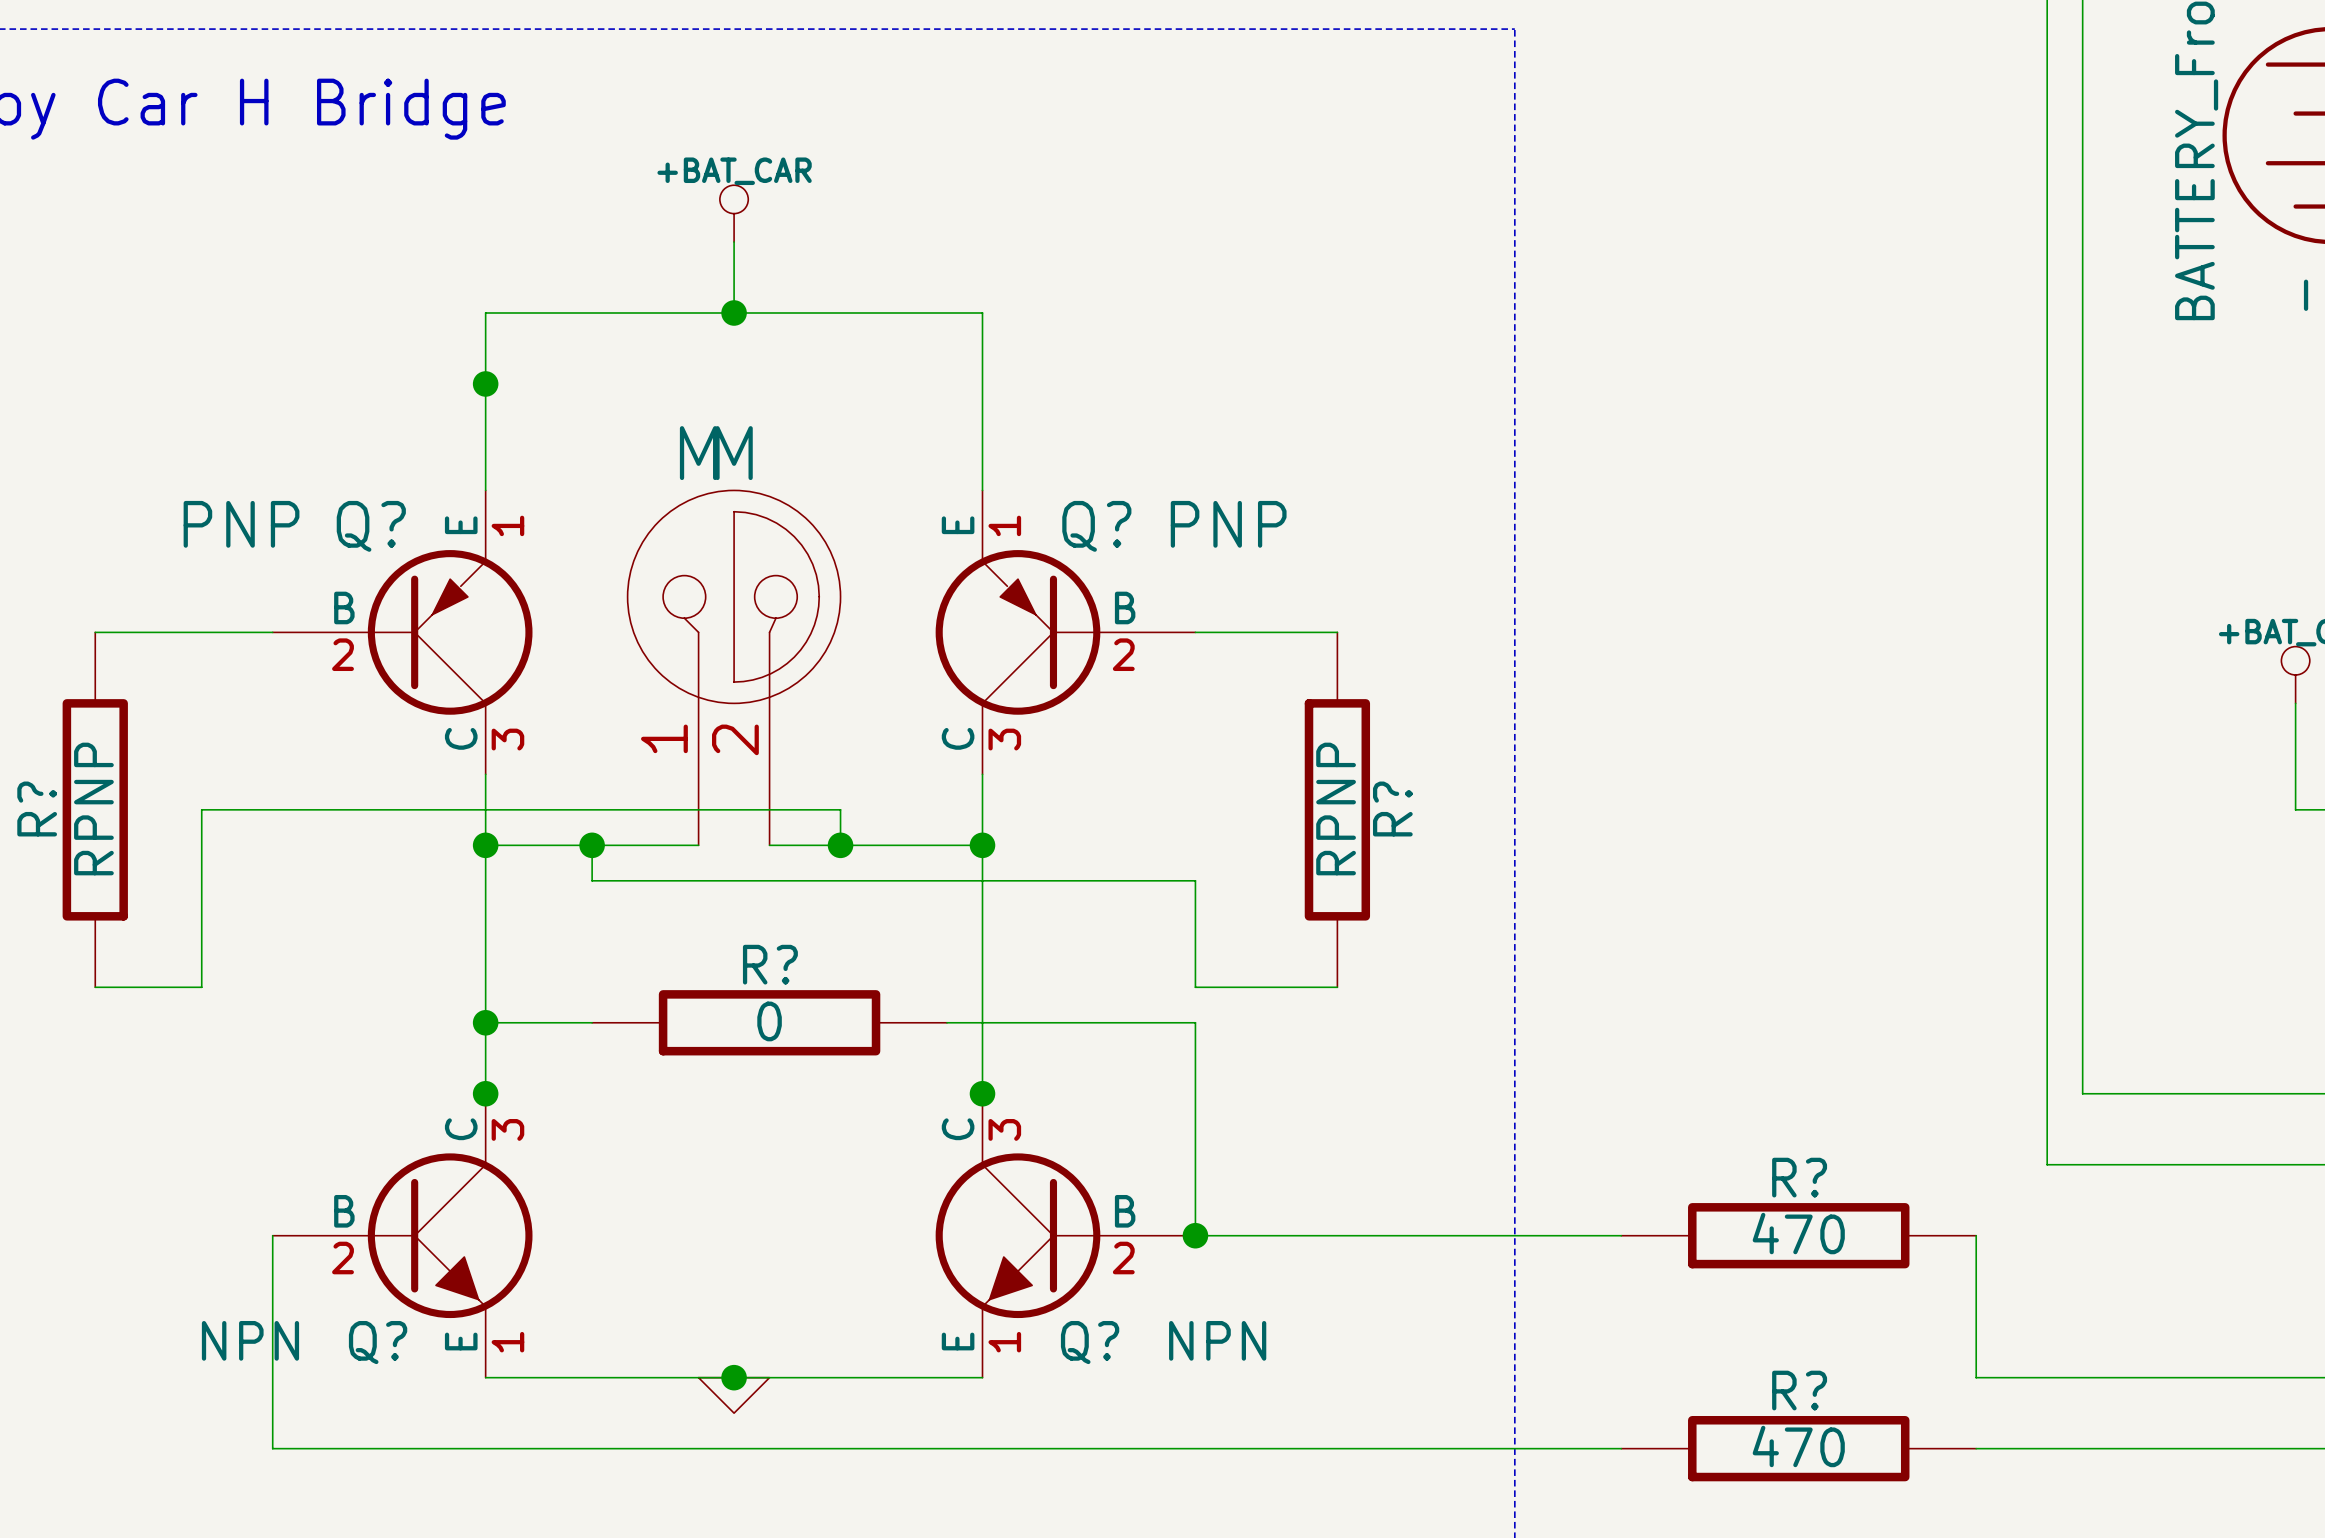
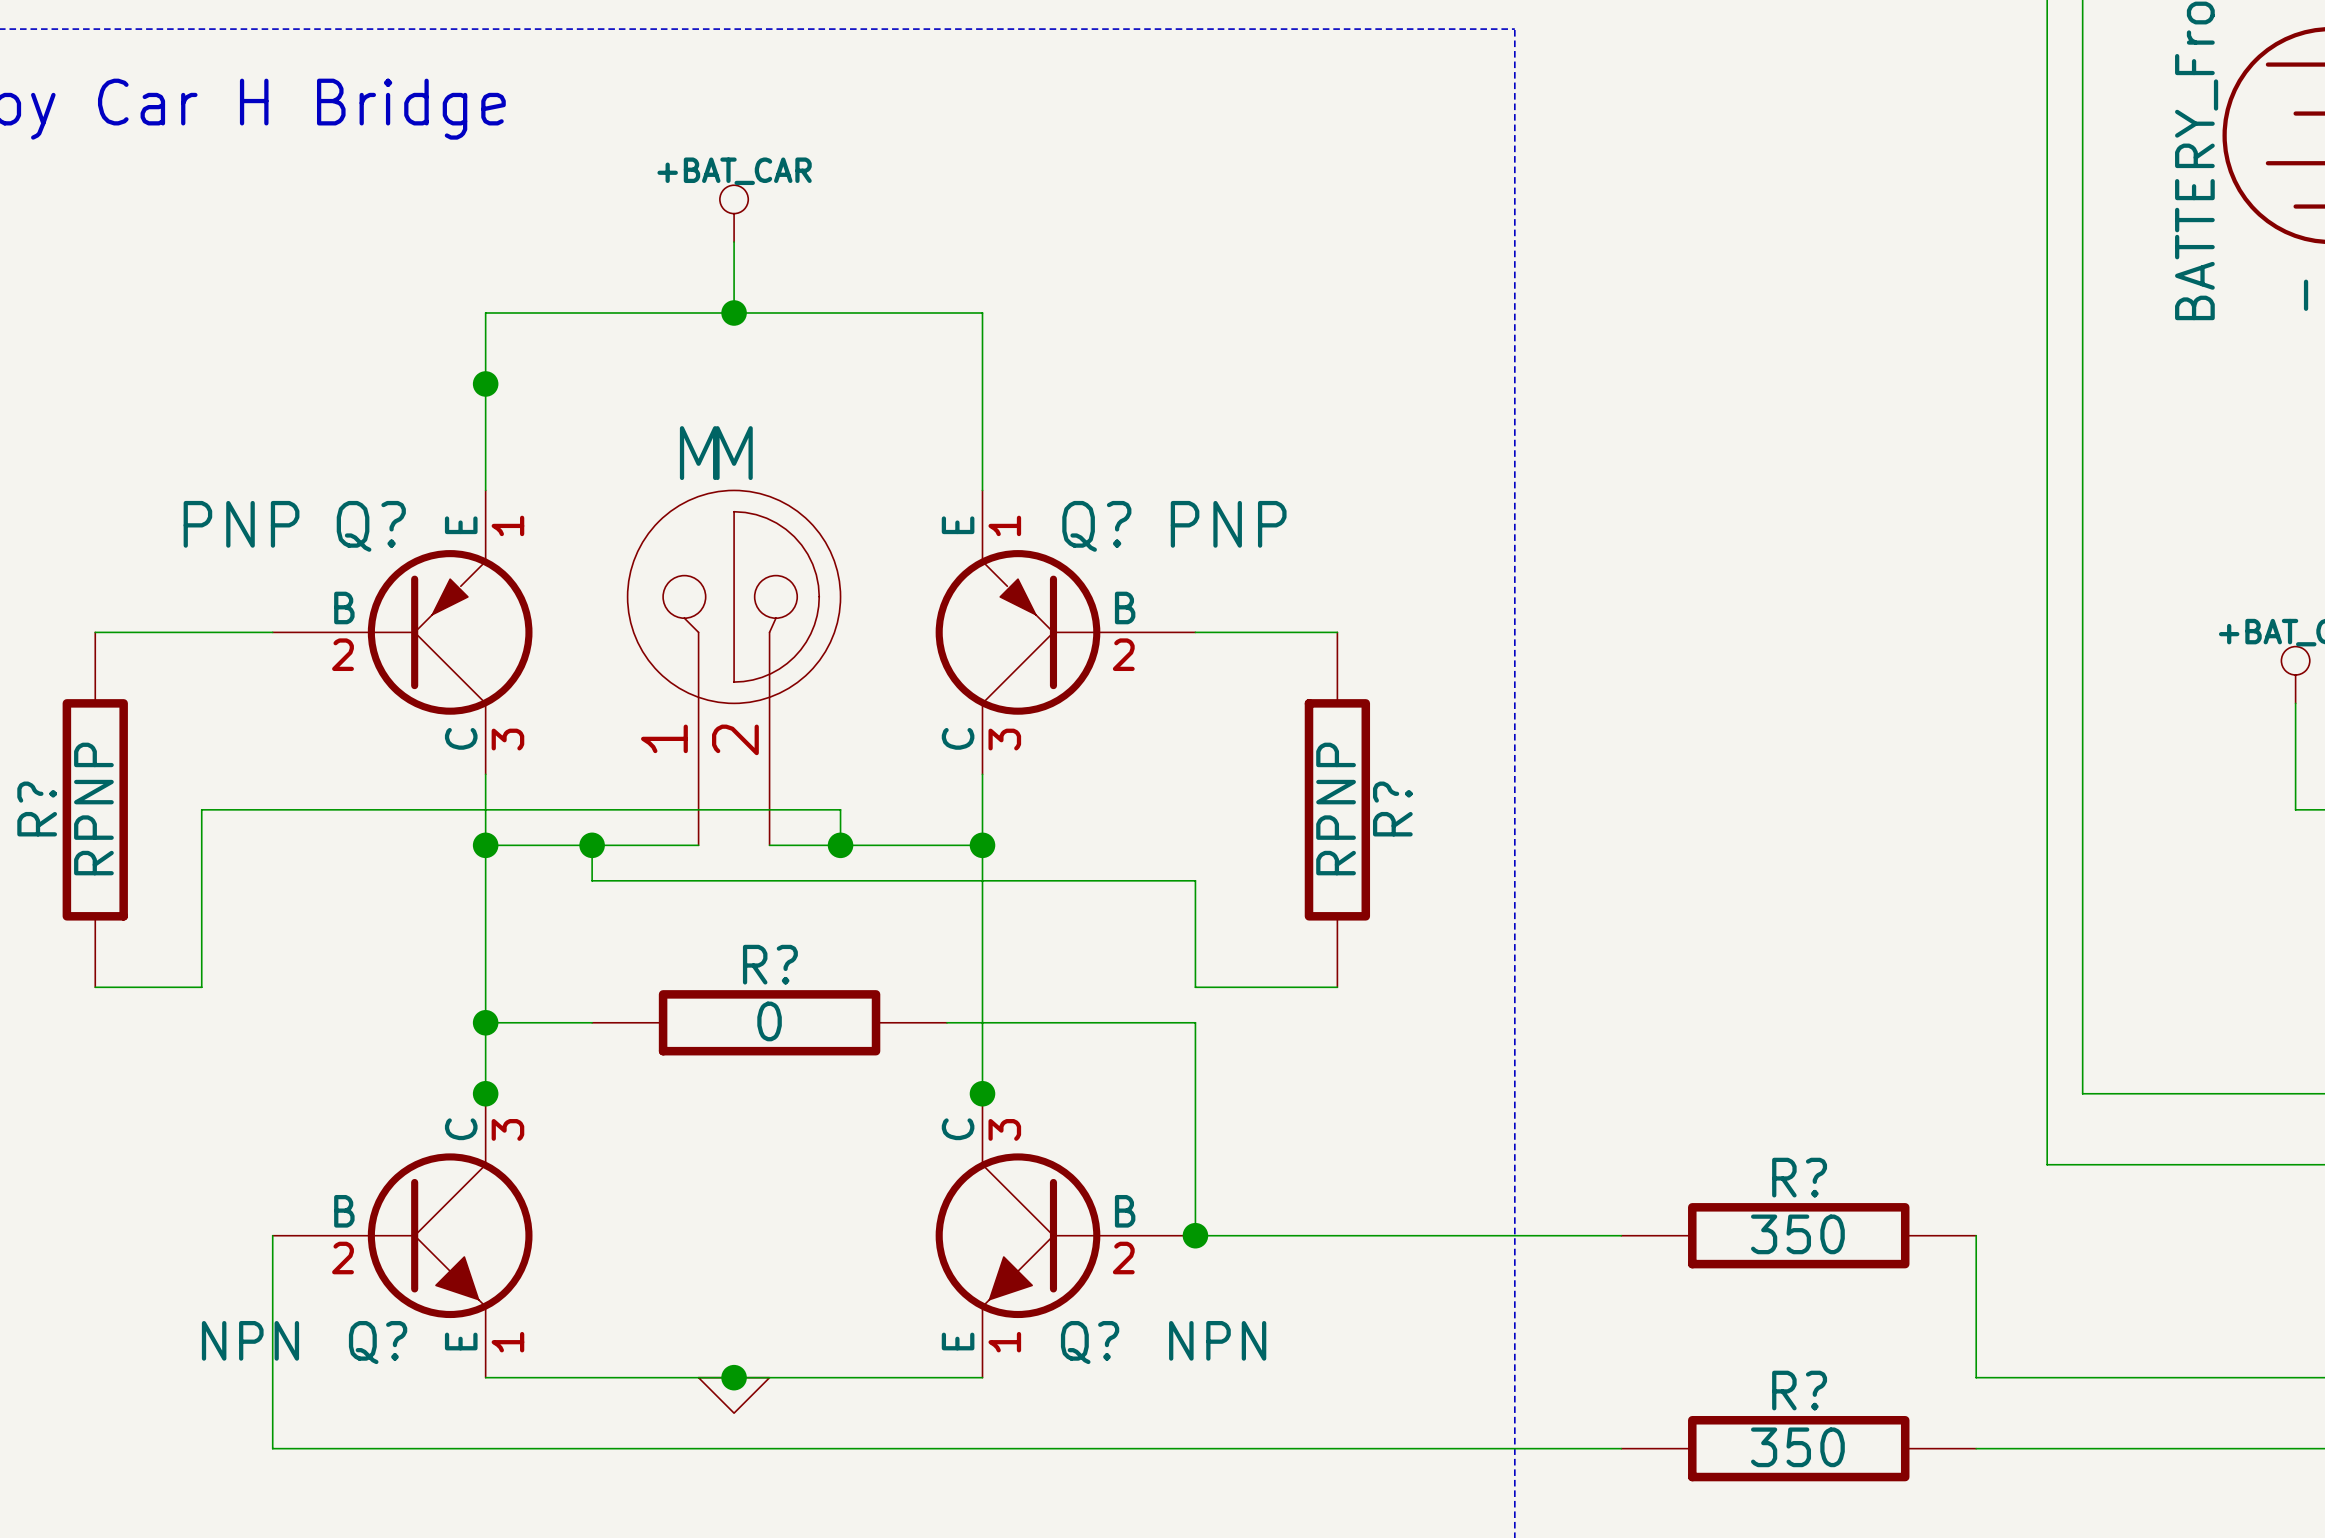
R? value: 470 (1798, 1233) -> 350 (1797, 1234)
R? value: 470 (1798, 1446) -> 350 (1797, 1447)

